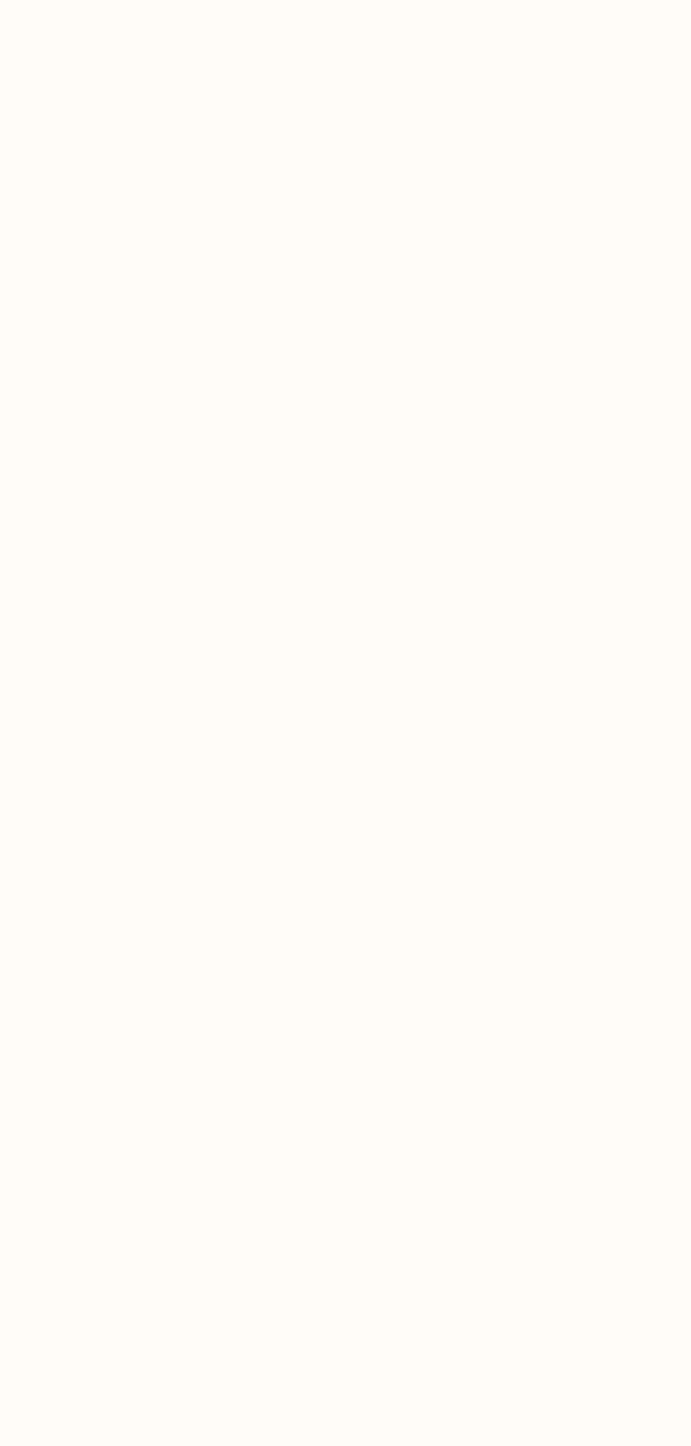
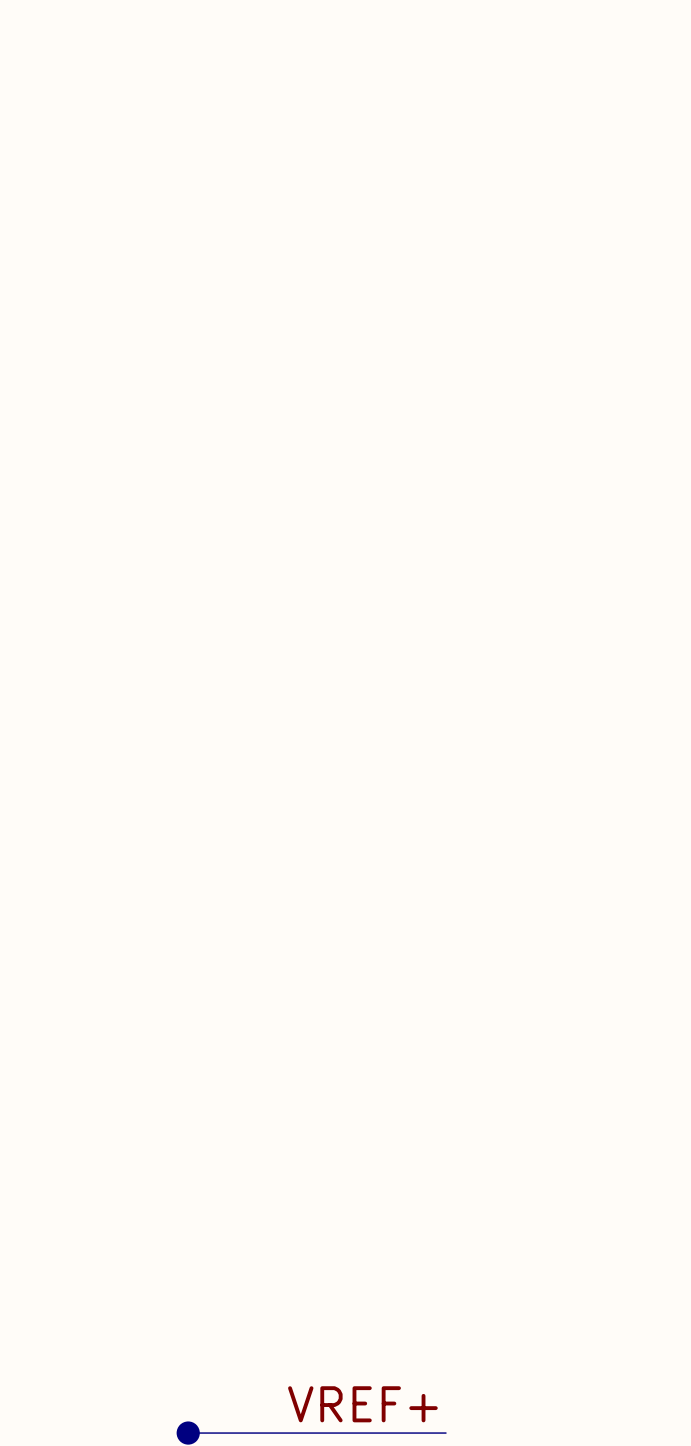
label: none -> VREF+ (362, 1404)
wire: none -> (188, 1433) (446, 1433)
junction: none -> (188, 1433)

